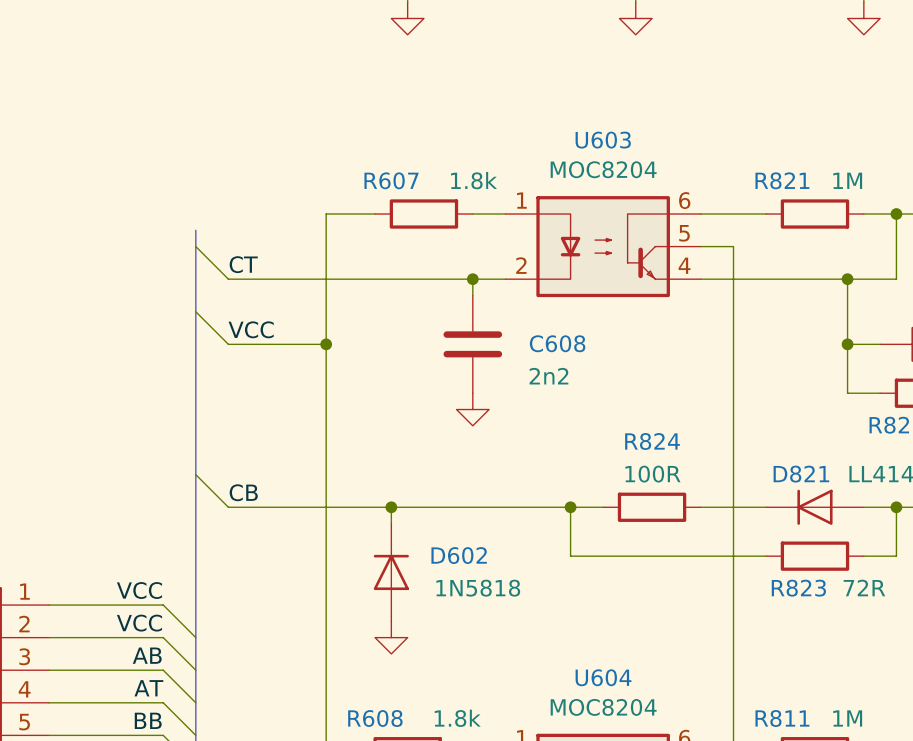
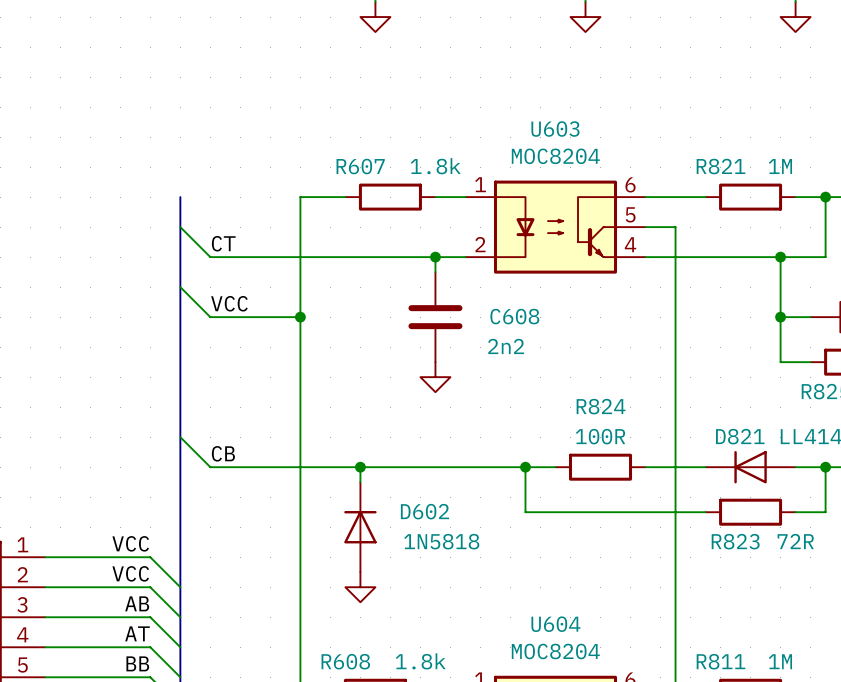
bus: none -> (180, 197) (180, 212)

